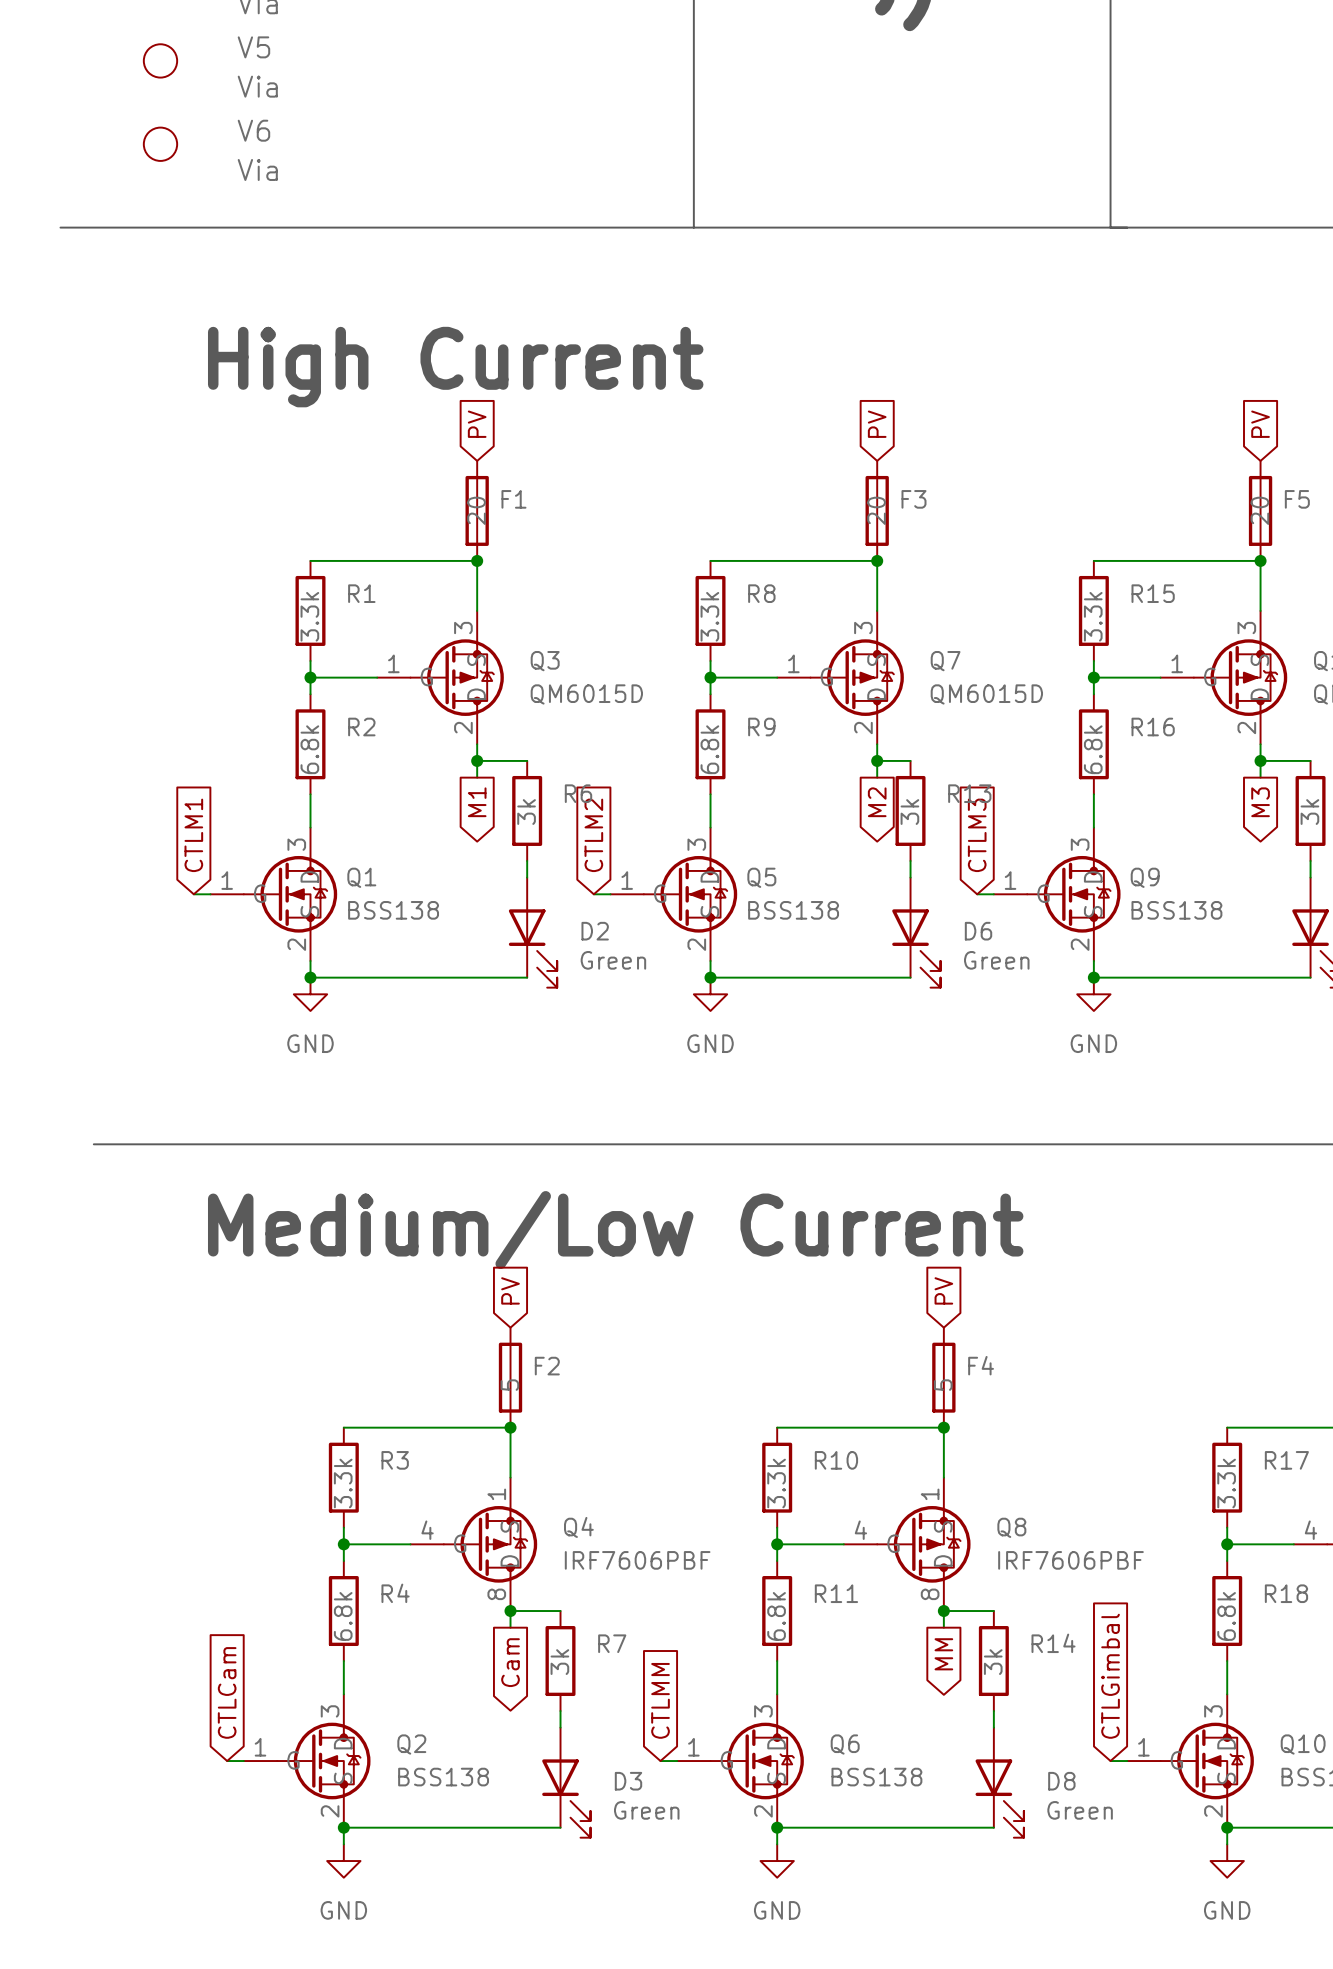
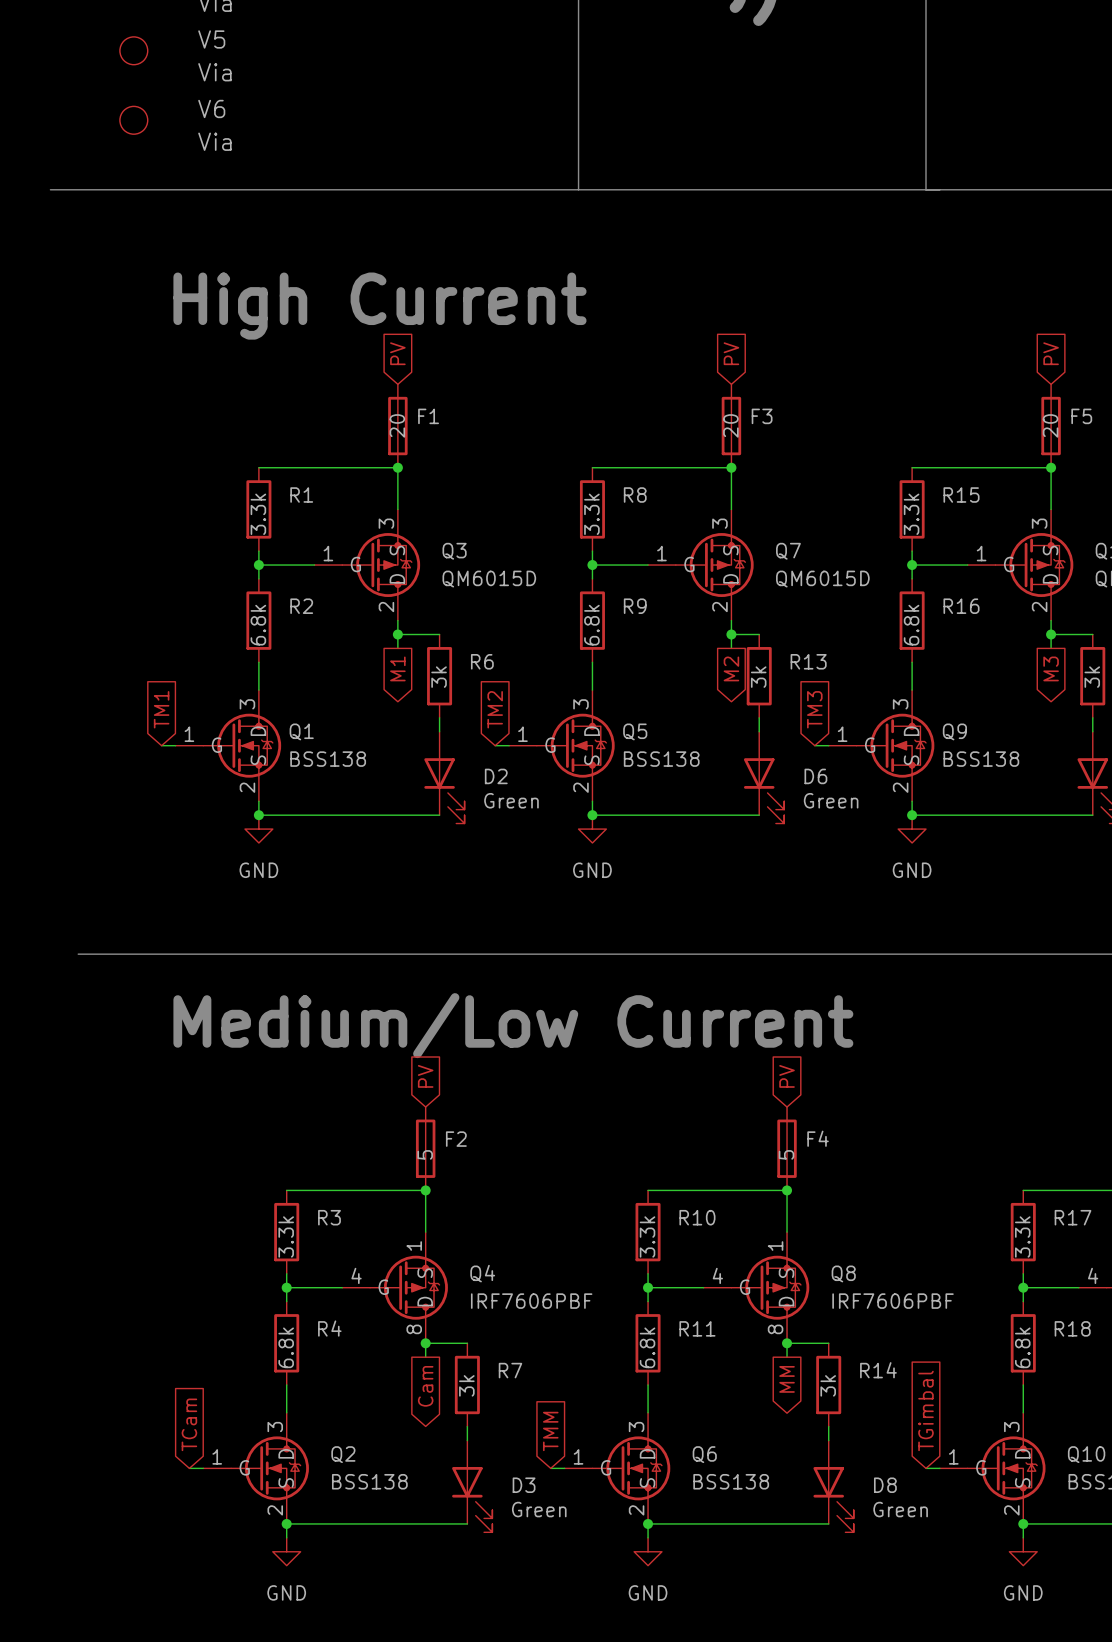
global label: CTLM1 (193, 835) -> TM1 (161, 709)
global label: CTLM2 (593, 835) -> TM2 (495, 709)
global label: CTLM3 (977, 835) -> TM3 (814, 709)
global label: CTLGimbal (1110, 1676) -> TGimbal (925, 1410)
global label: CTLCam (227, 1692) -> TCam (189, 1424)
global label: CTLMM (660, 1700) -> TMM (550, 1431)

